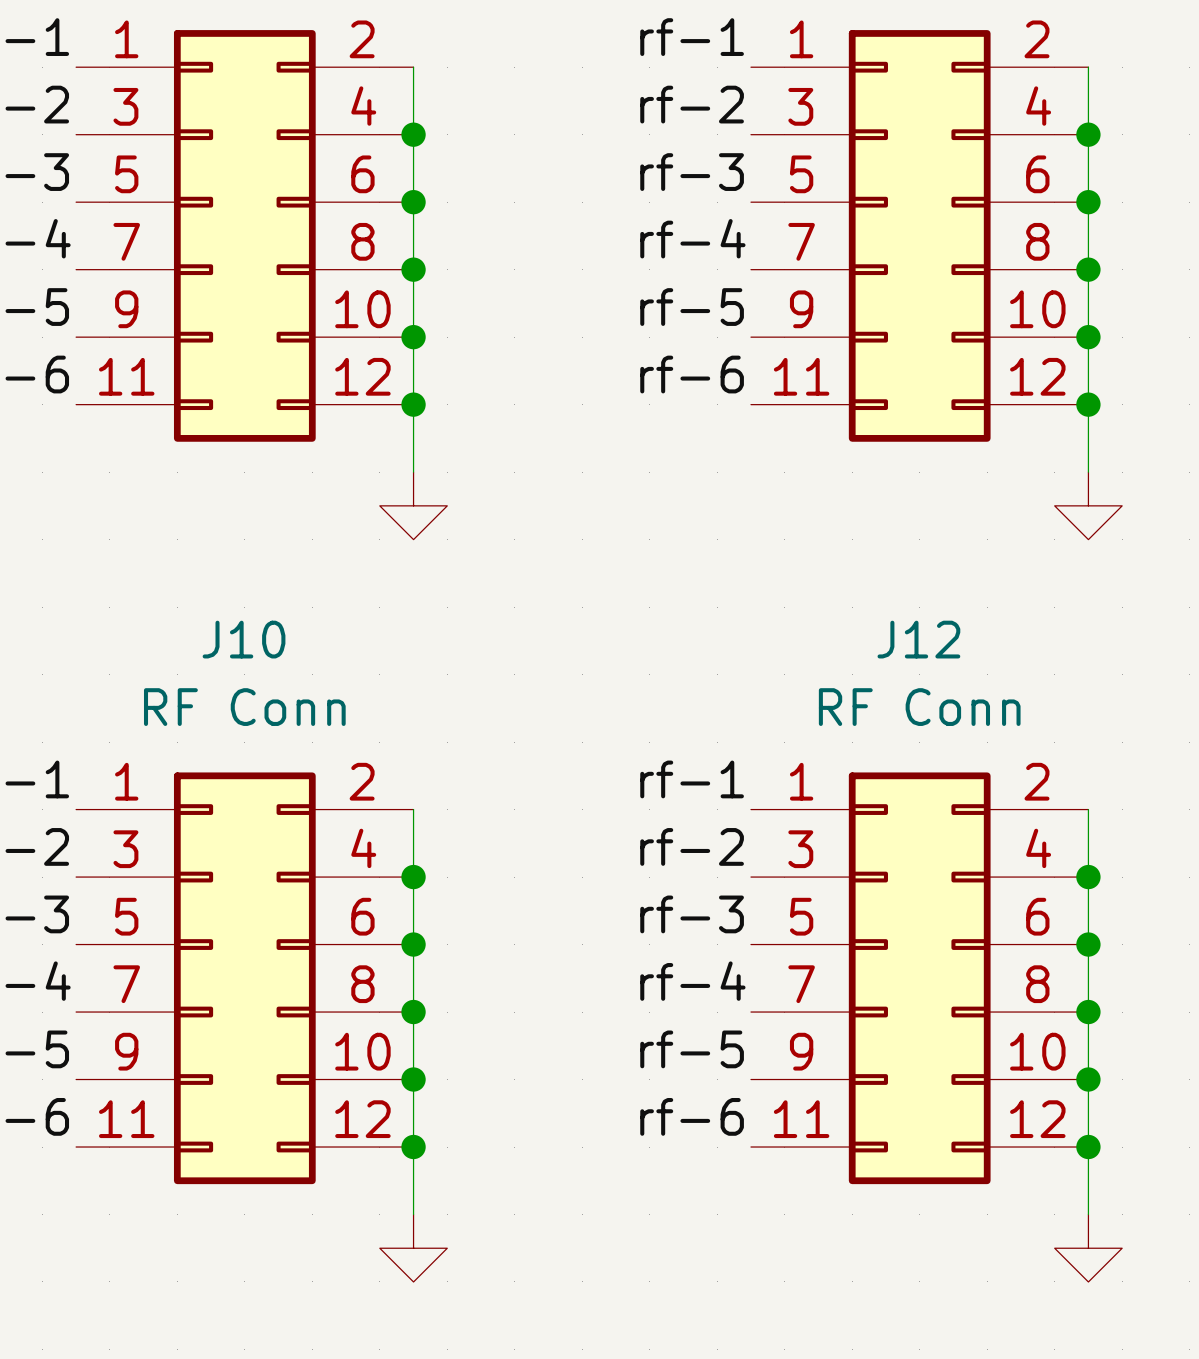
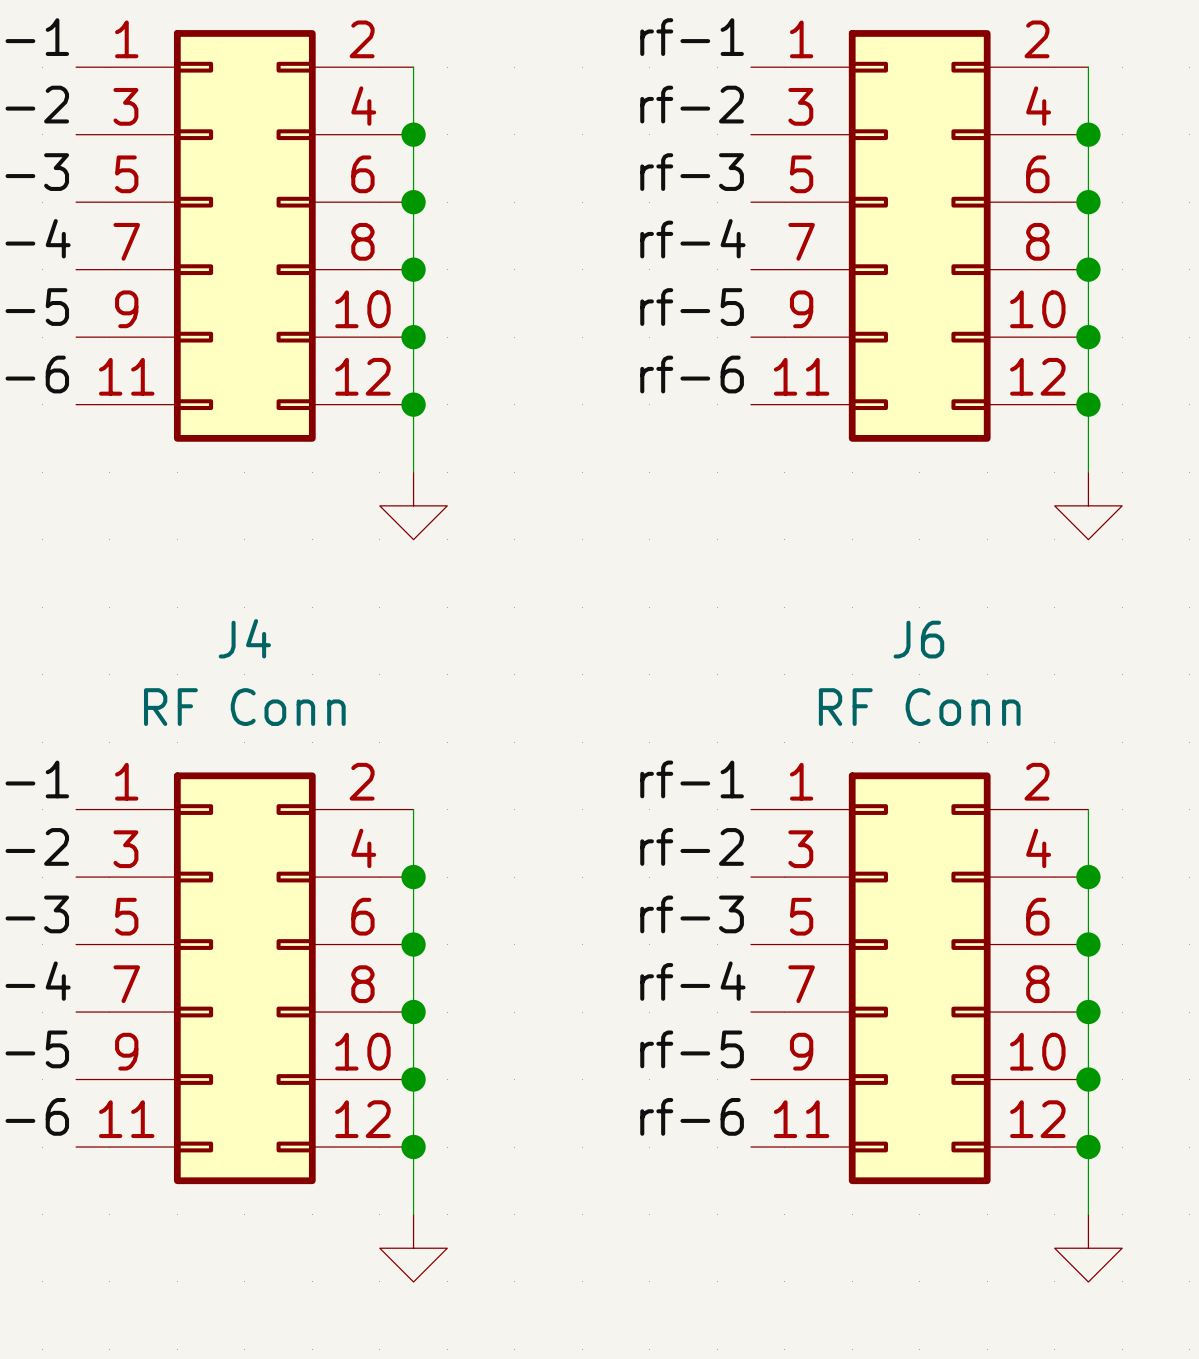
J10 name: J10 (244, 639) -> J4 (244, 638)
J12 name: J12 (918, 639) -> J6 (918, 639)

